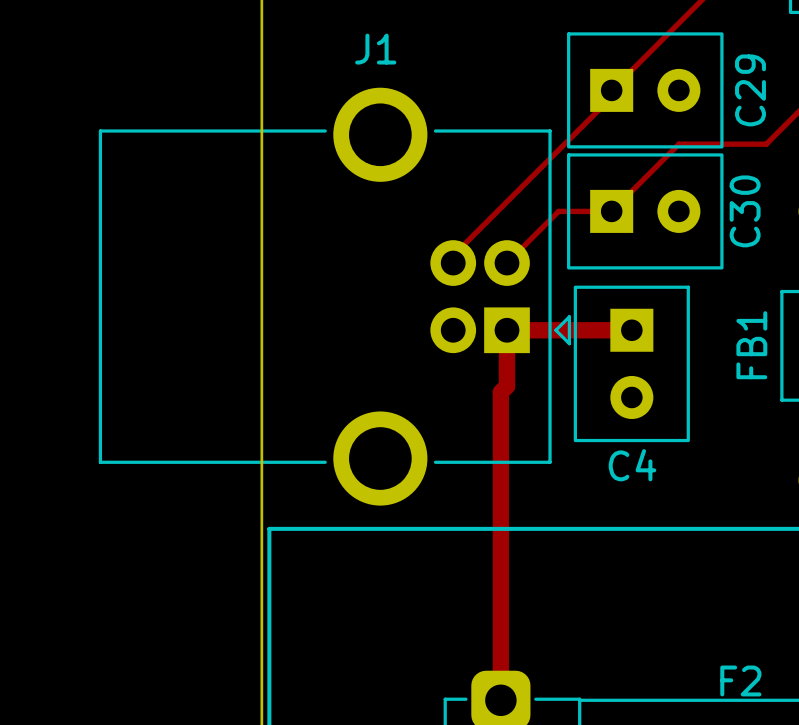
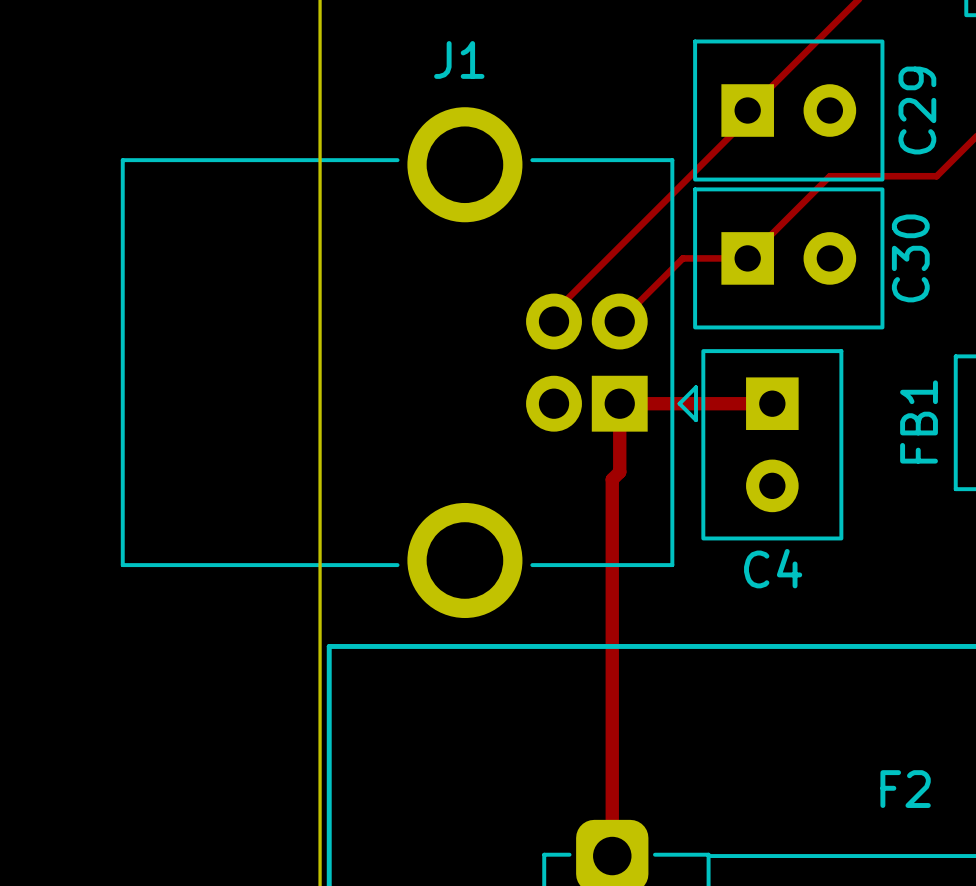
top track width: thick (631, 330) (507, 330) (507, 386) (500, 392) (500, 700) -> thin (772, 403) (619, 403) (619, 472) (612, 479) (612, 856)
F2 name position: F2 (740, 680) -> F2 (905, 789)

